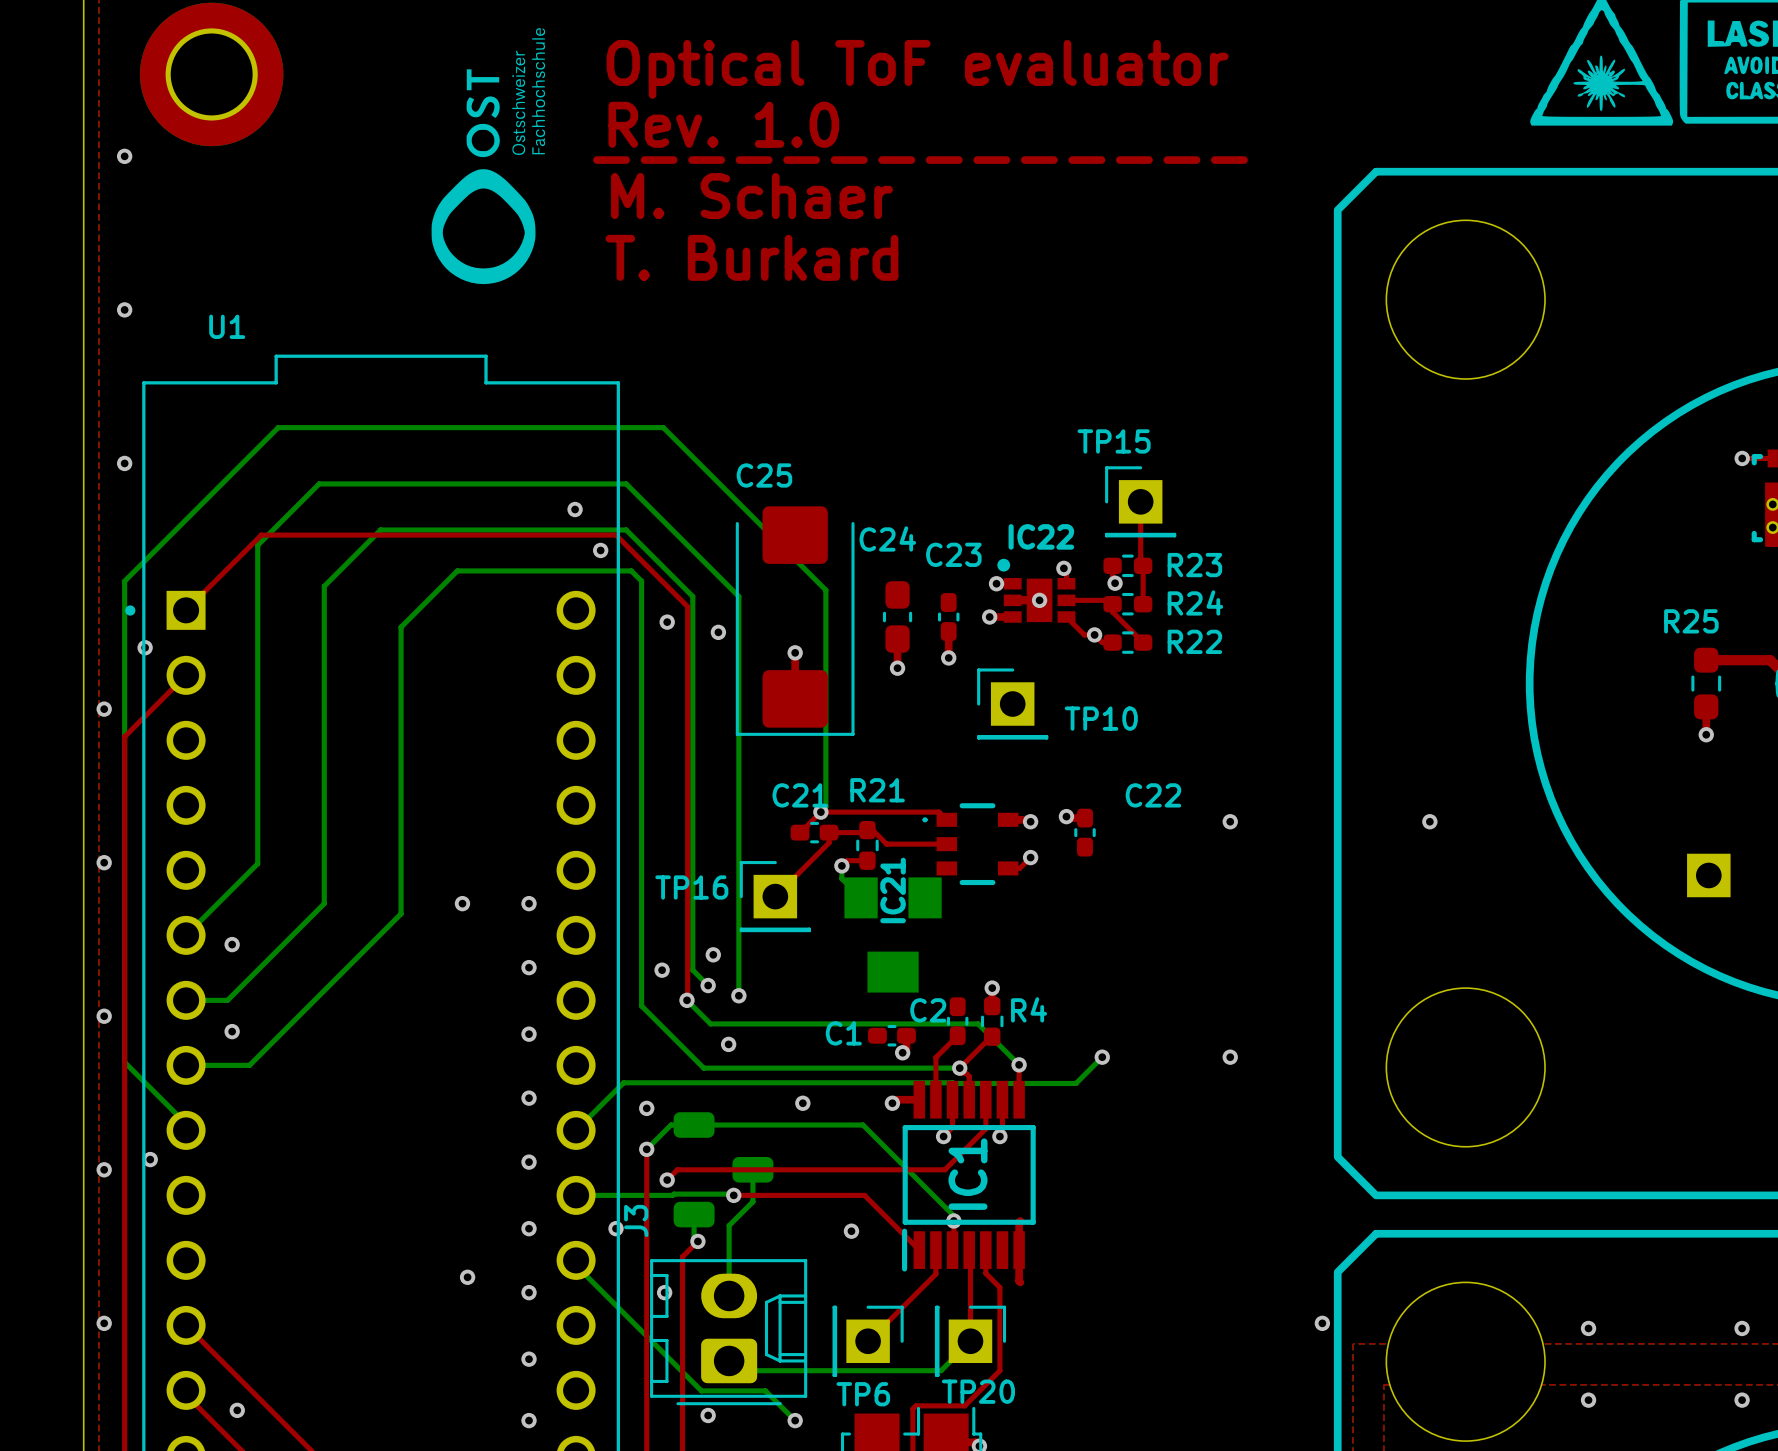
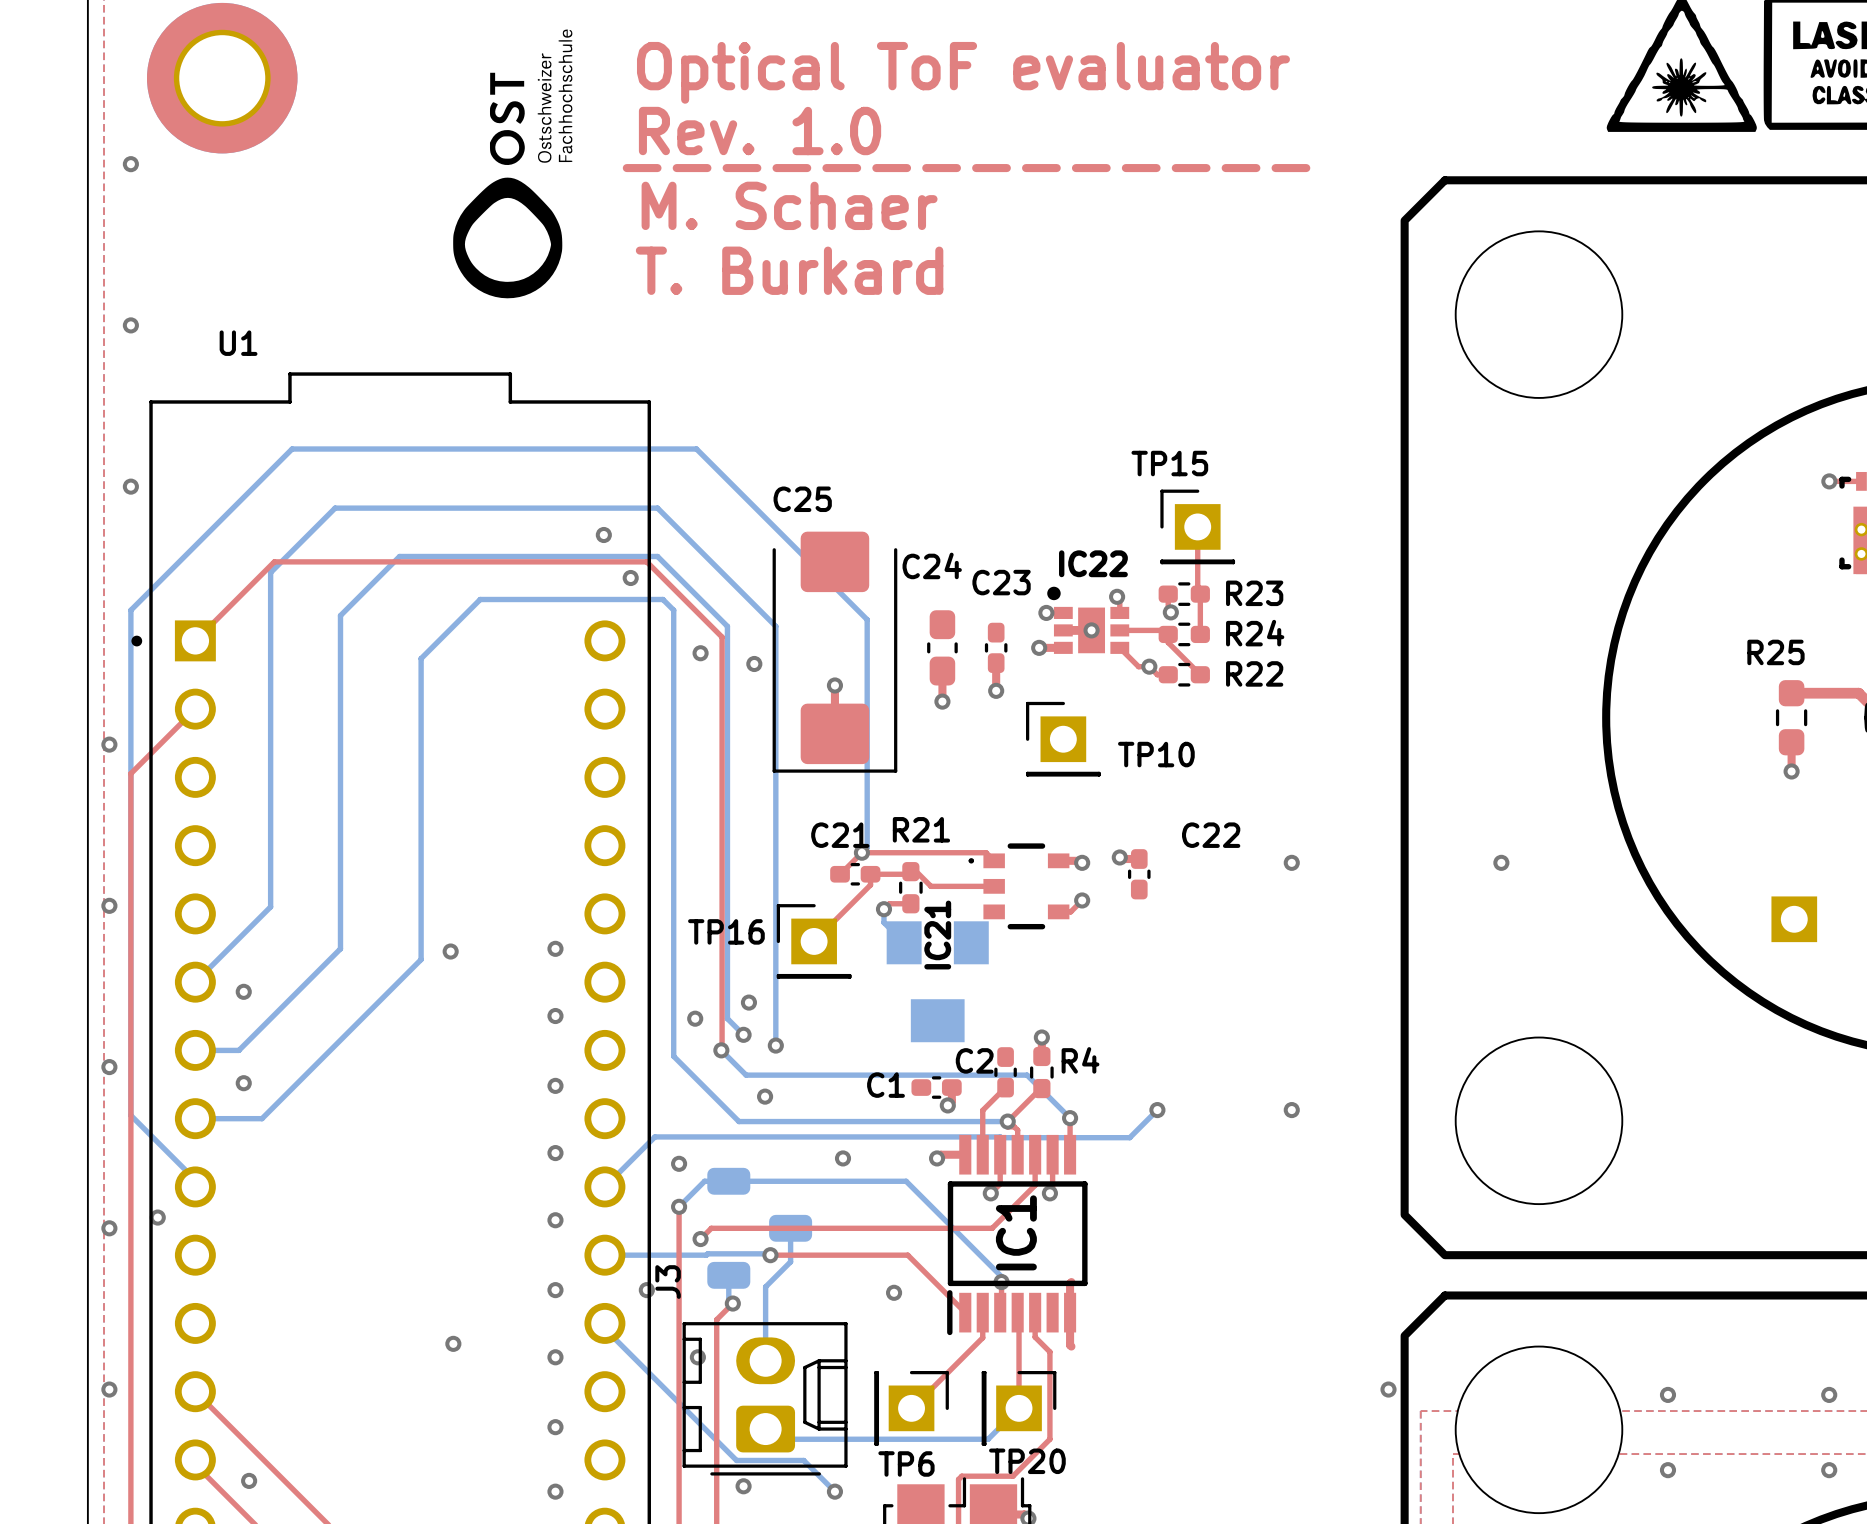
via: (145, 647) -> none
via position: (462, 903) -> (450, 951)
via position: (467, 1277) -> (453, 1343)

